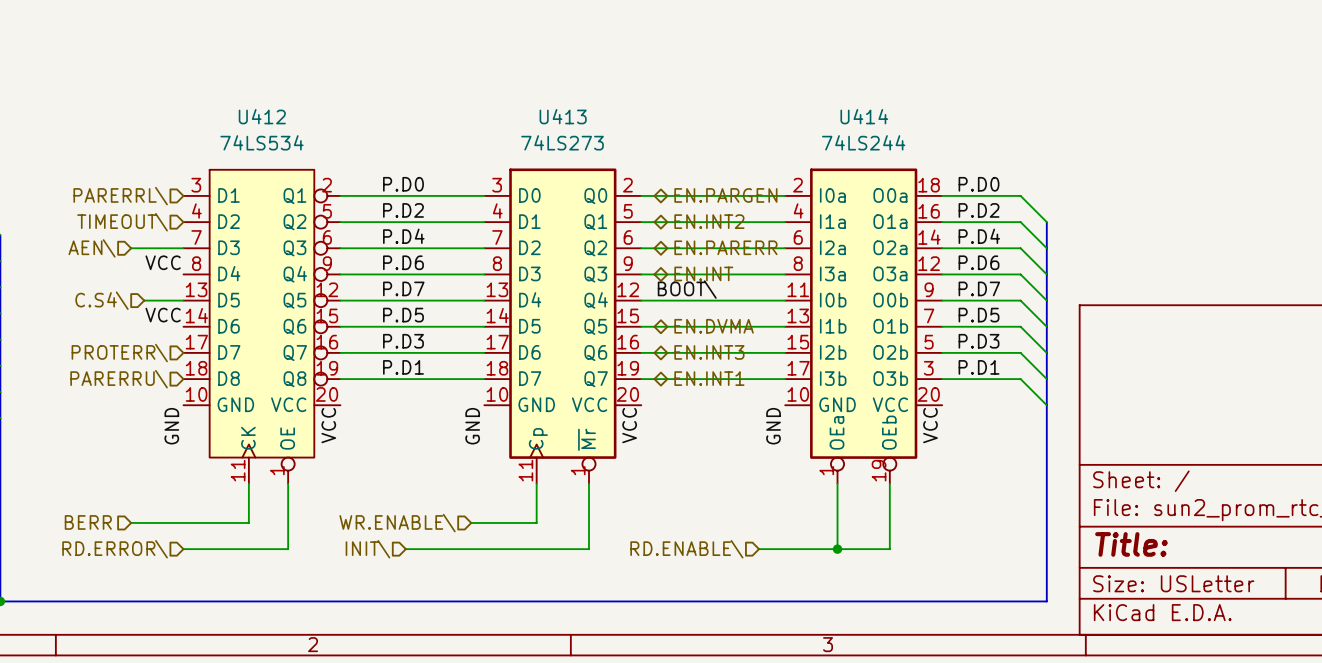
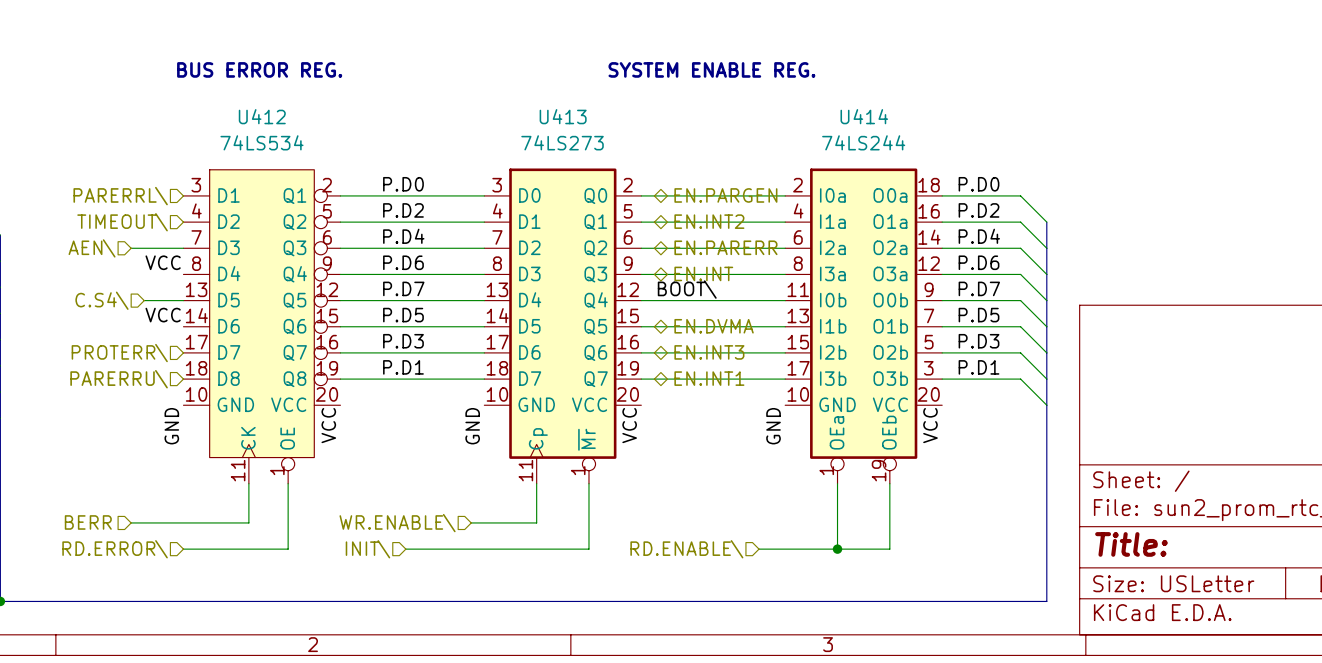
text: none -> BUS ERROR REG. (259, 69)
text: none -> SYSTEM ENABLE REG. (711, 69)

